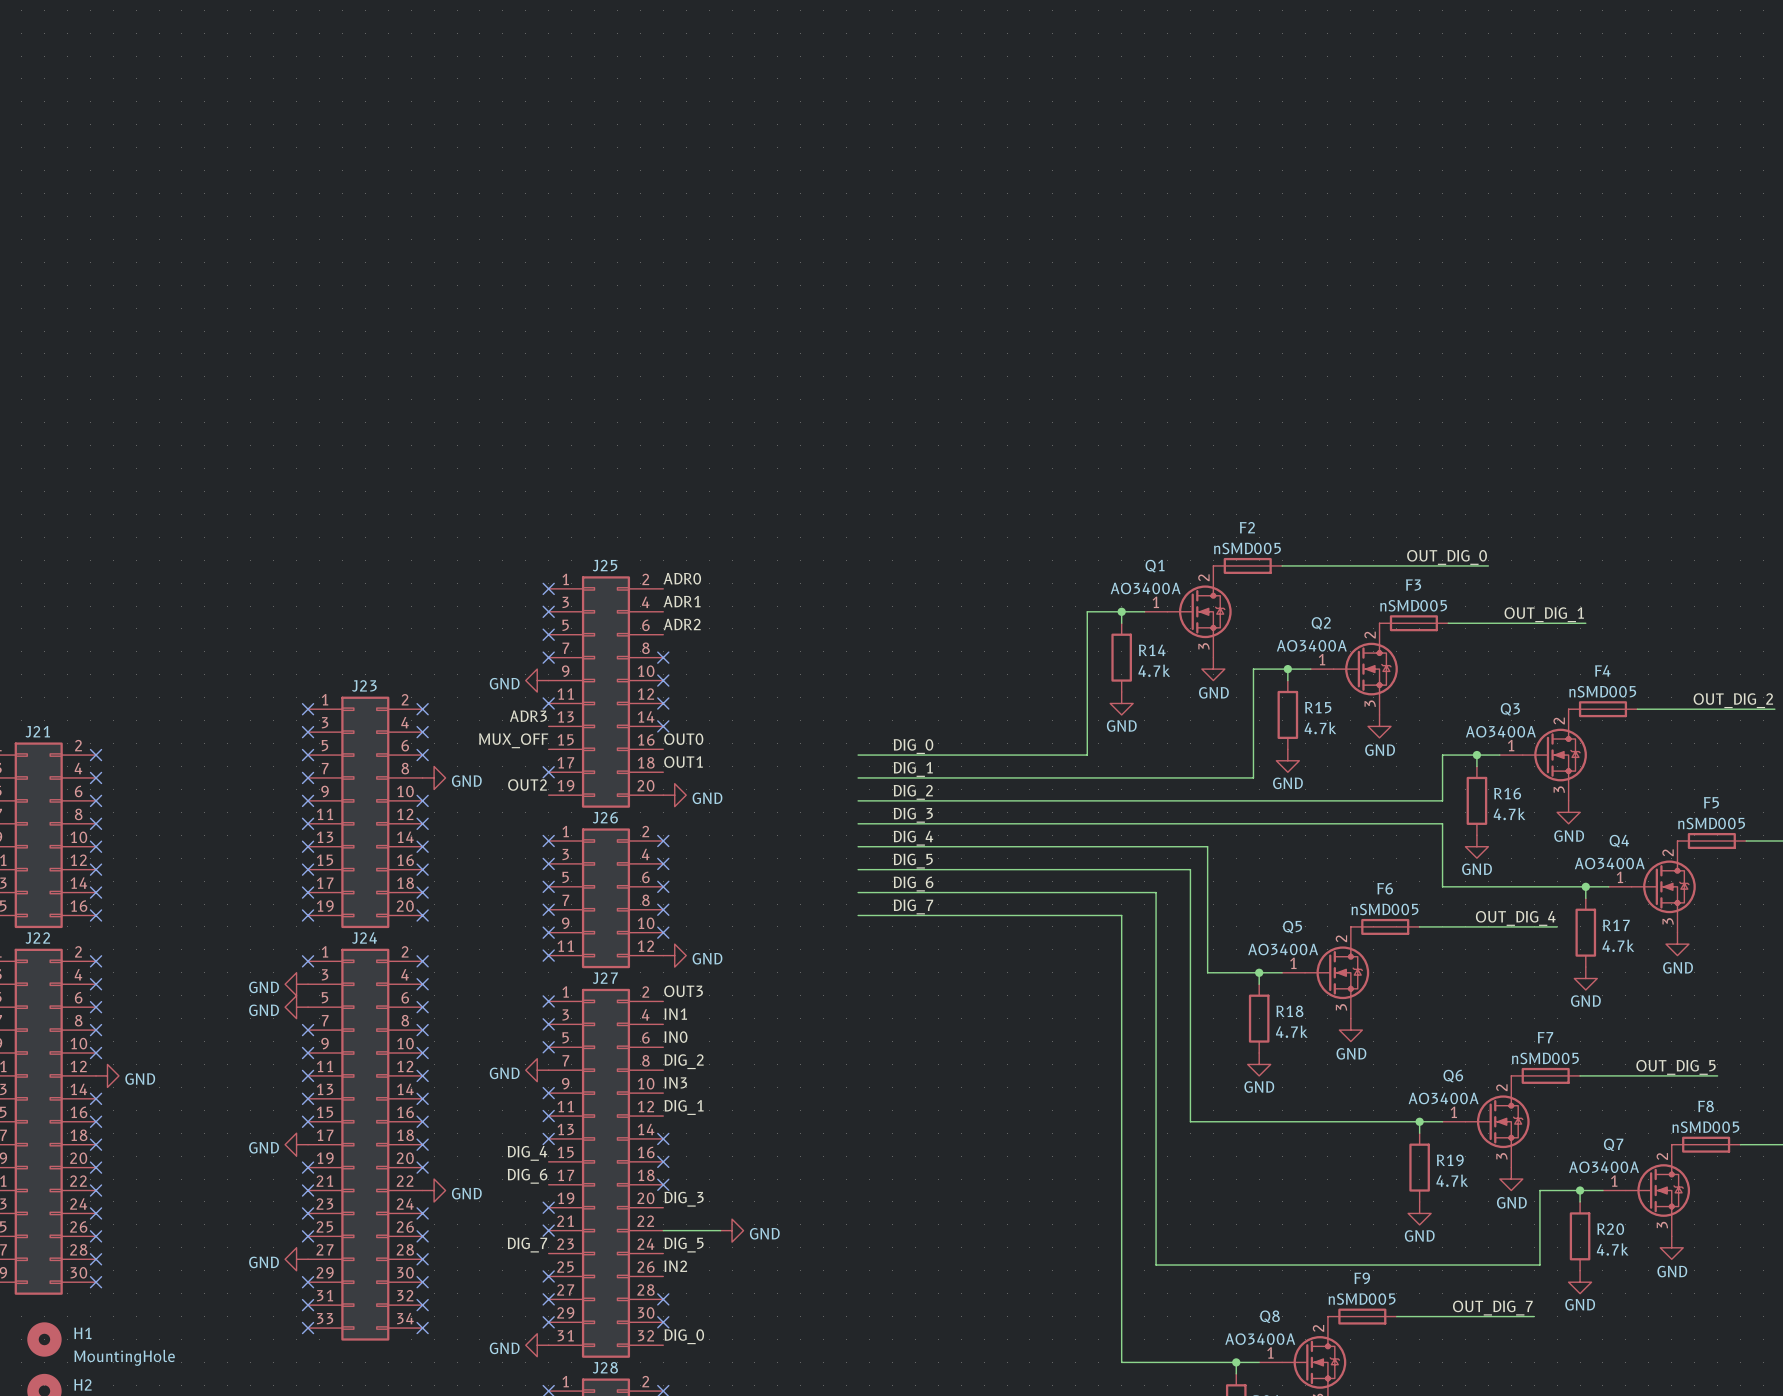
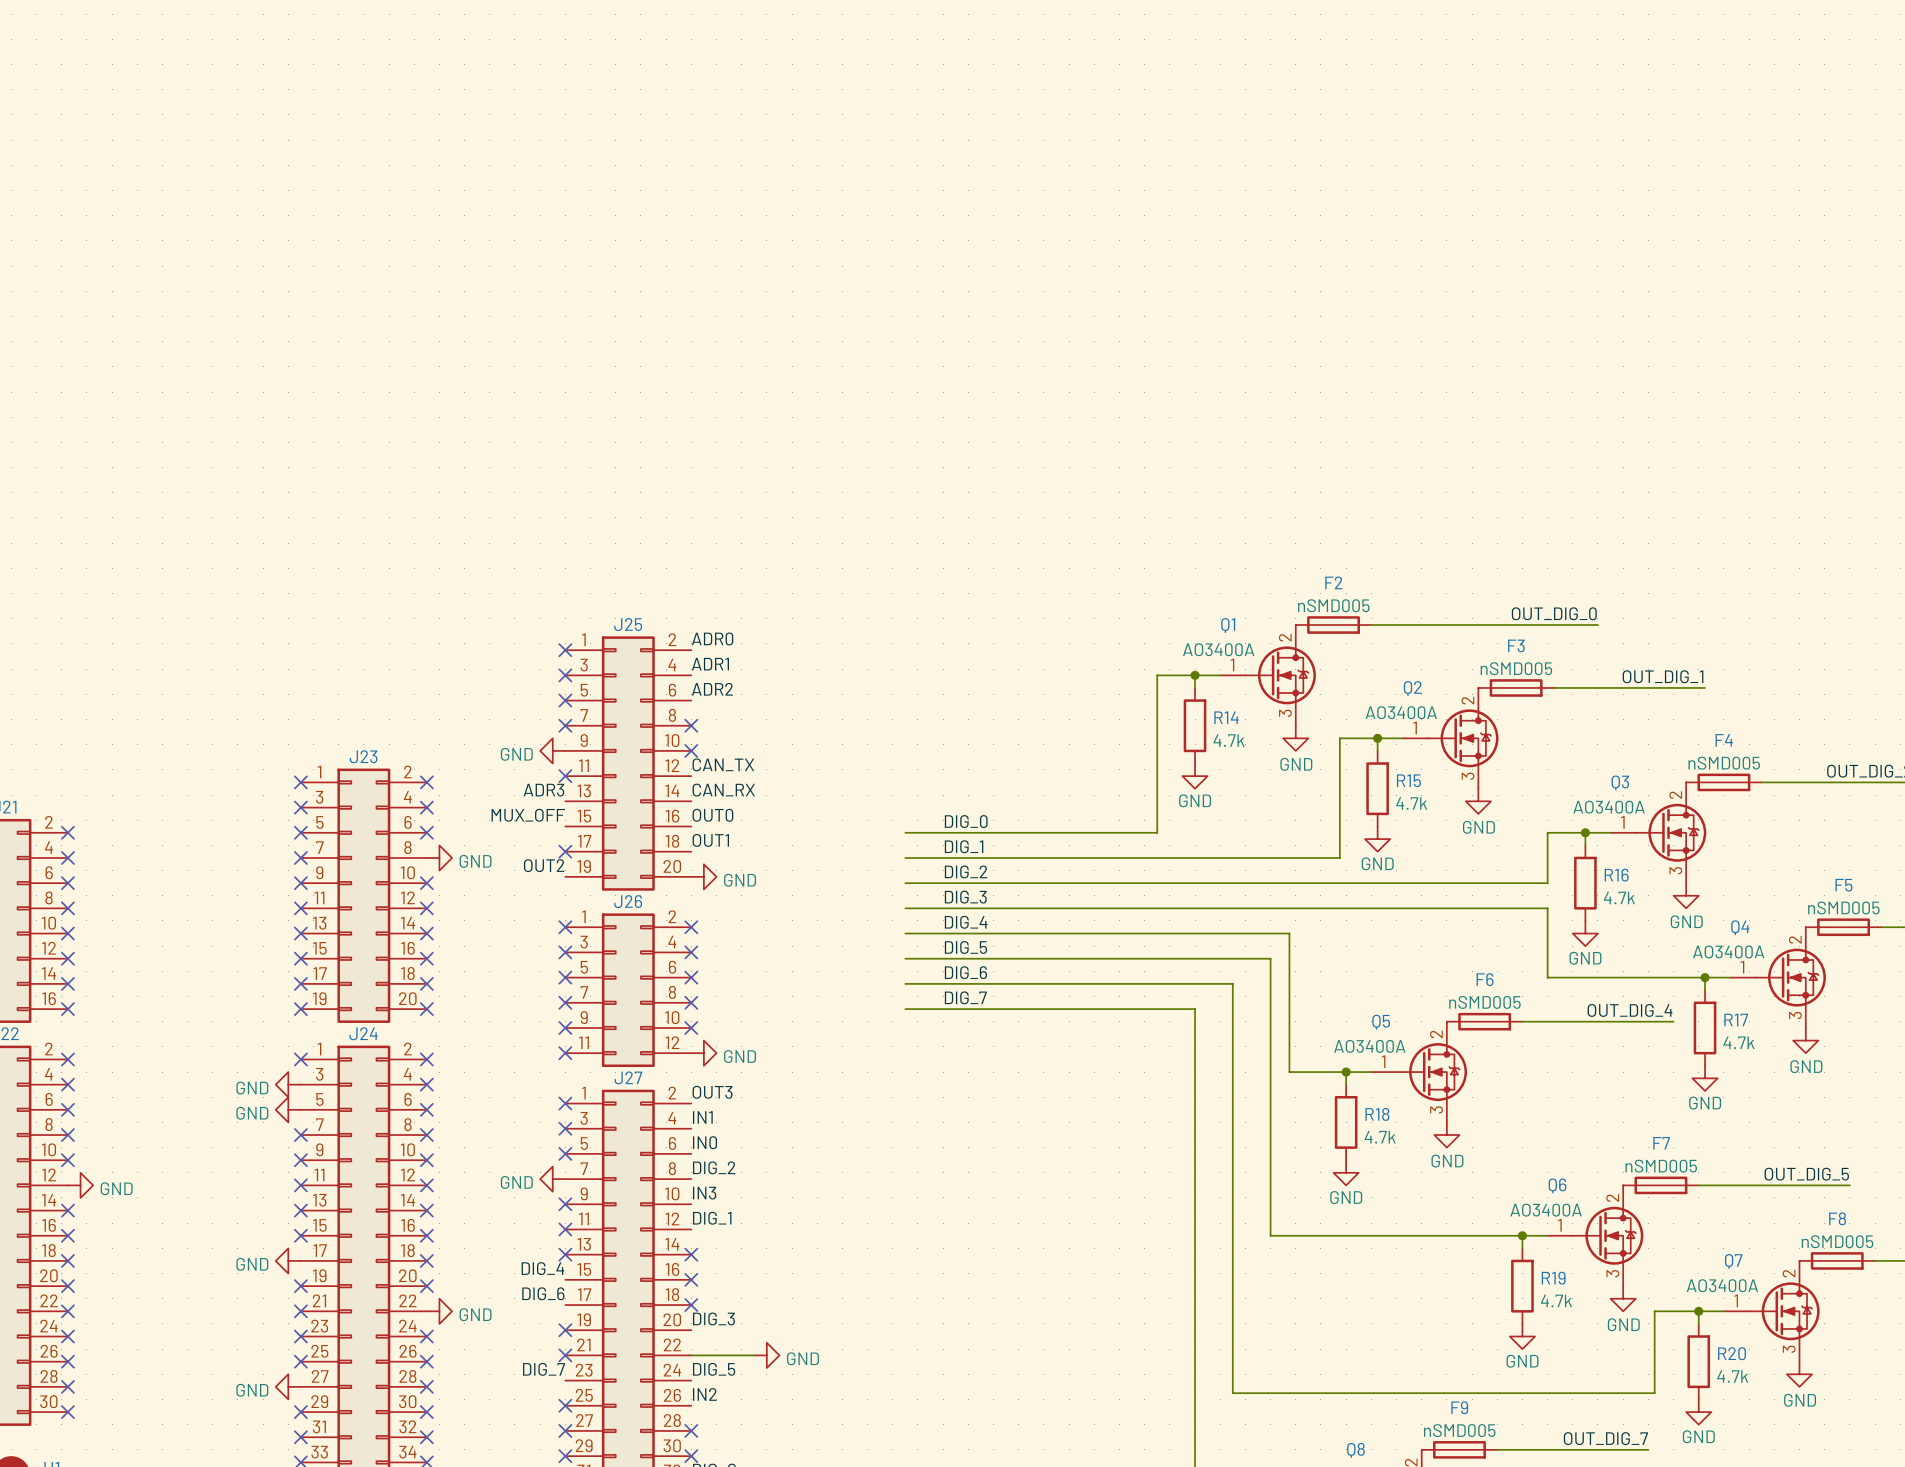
label: none -> CAN_TX (723, 764)
no-connect mark: (663, 703) -> none
label: none -> CAN_RX (723, 790)
no-connect mark: (663, 726) -> none

